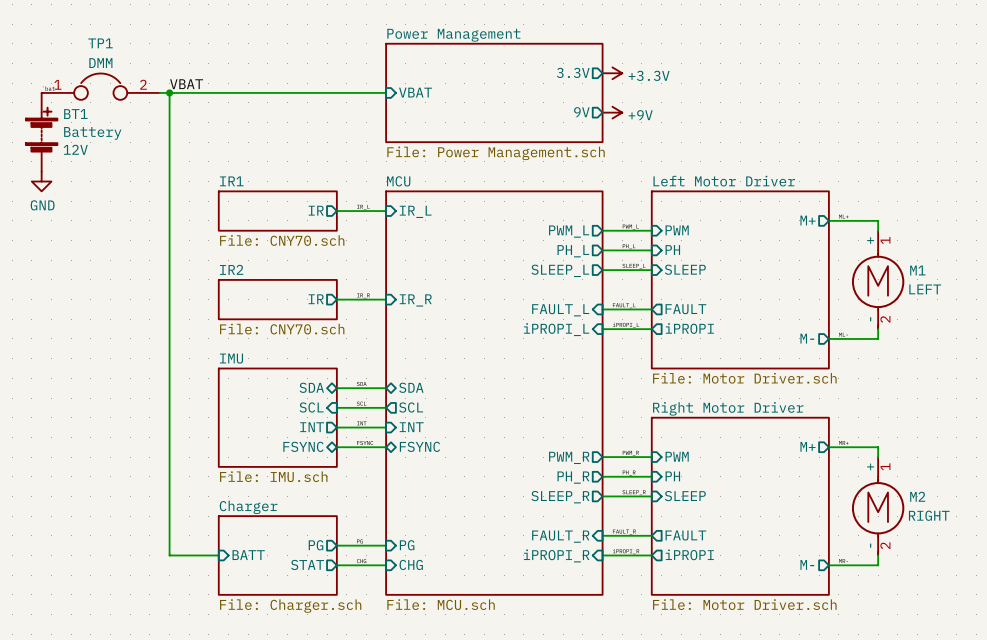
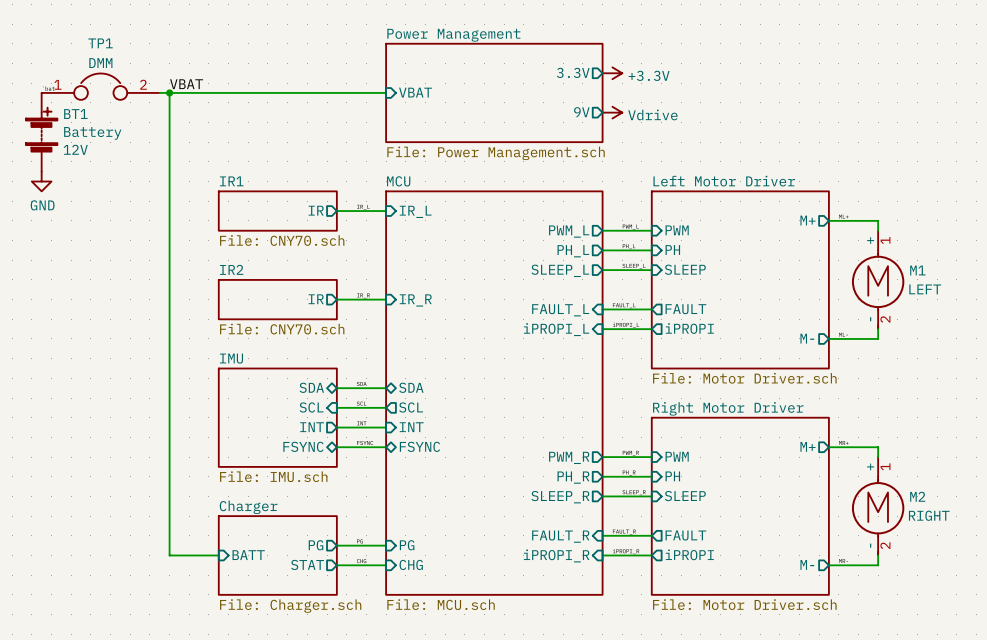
power symbol: +9V (612, 112) -> Vdrive (612, 112)

